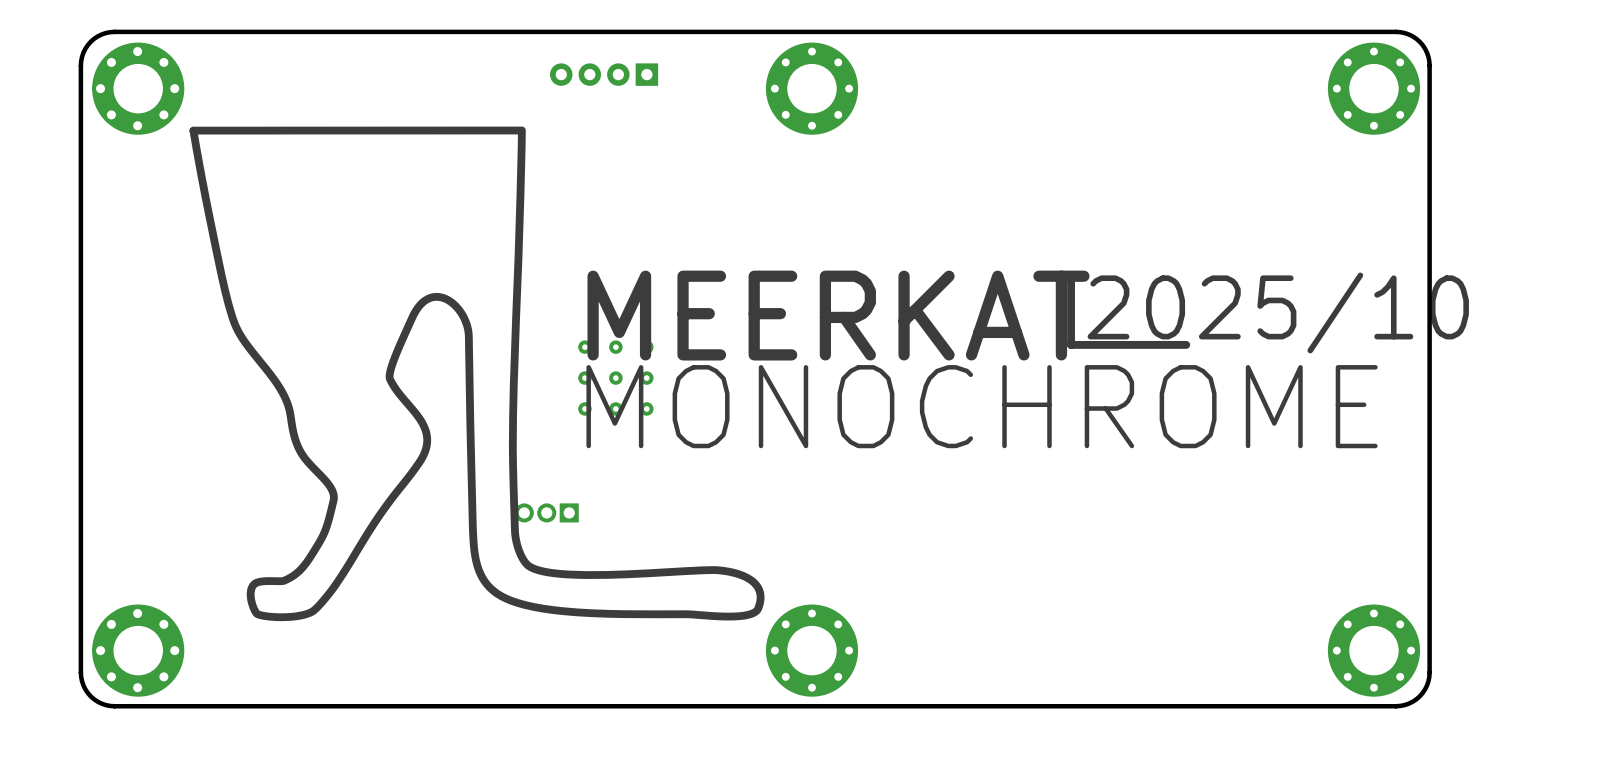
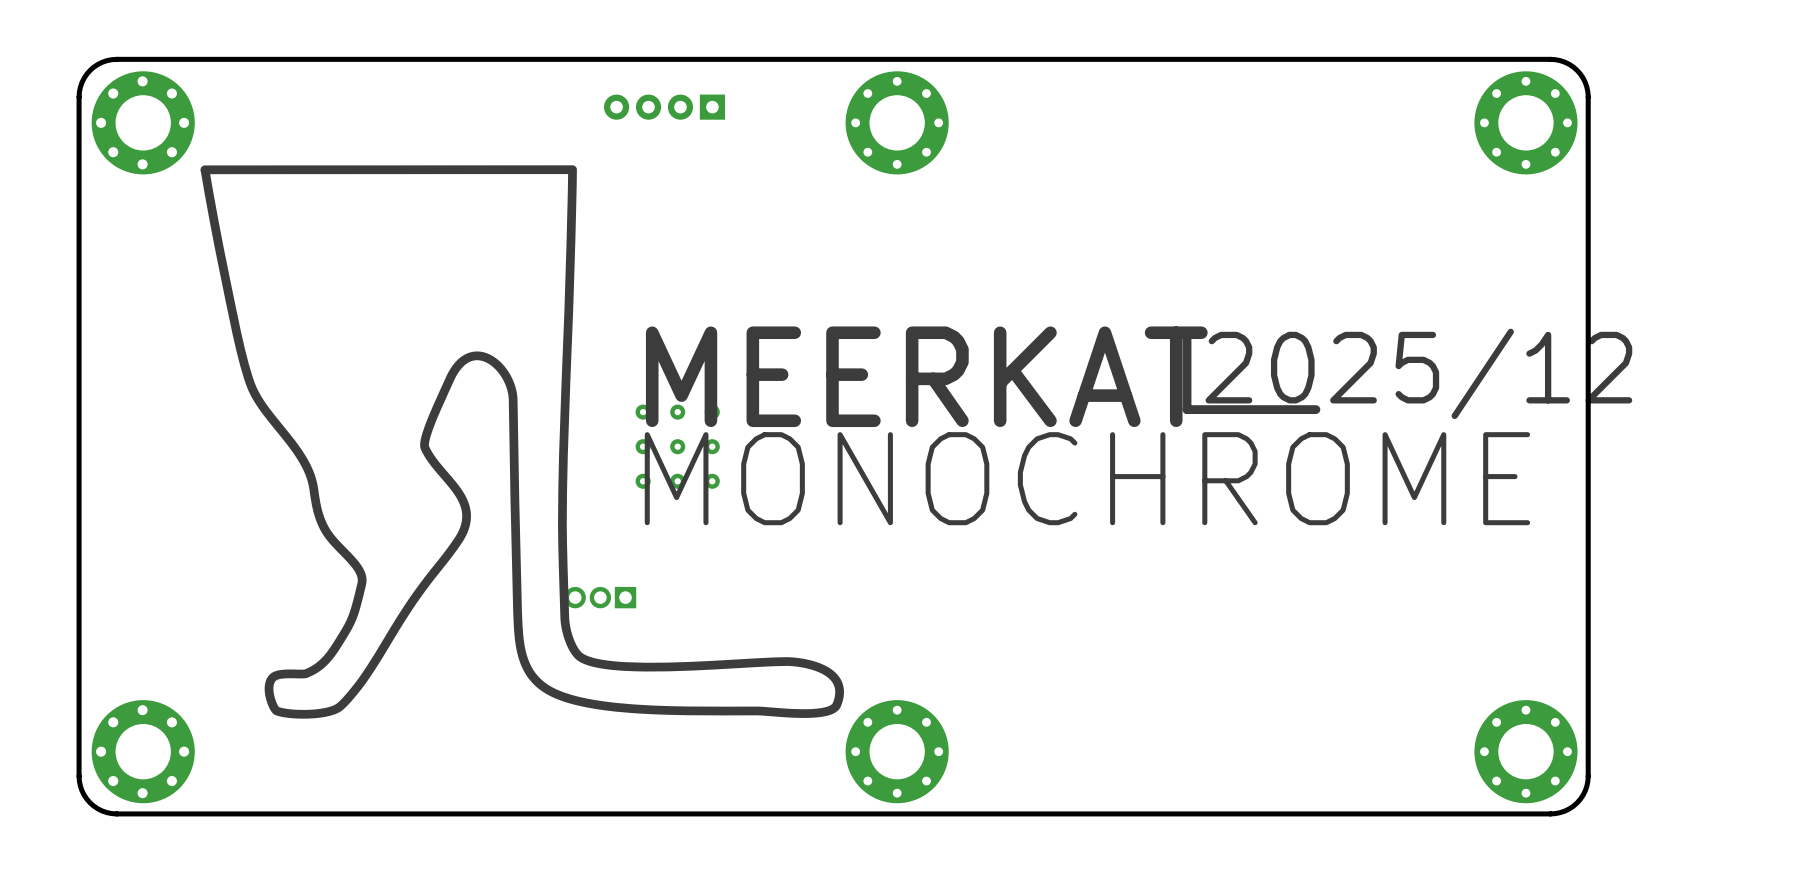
text: 2025/10 (1278, 312) -> 2025/12 (1418, 373)

